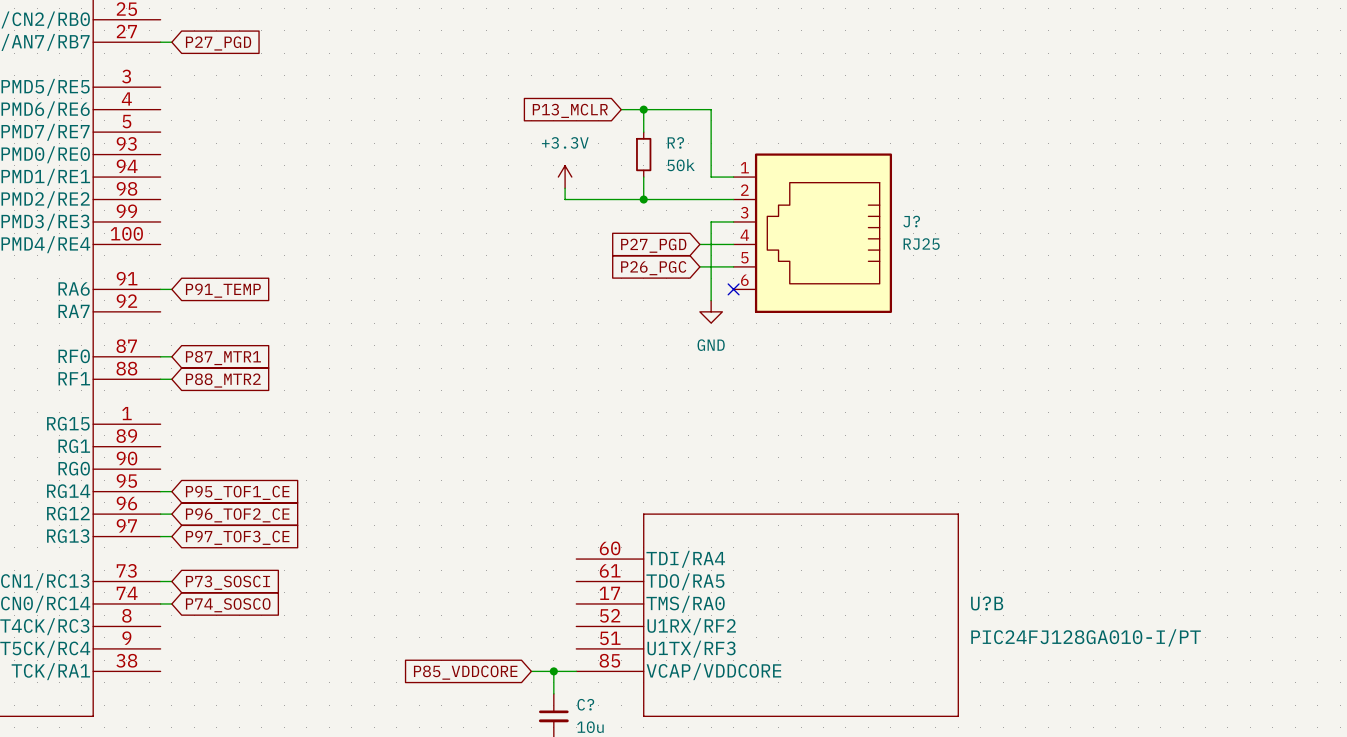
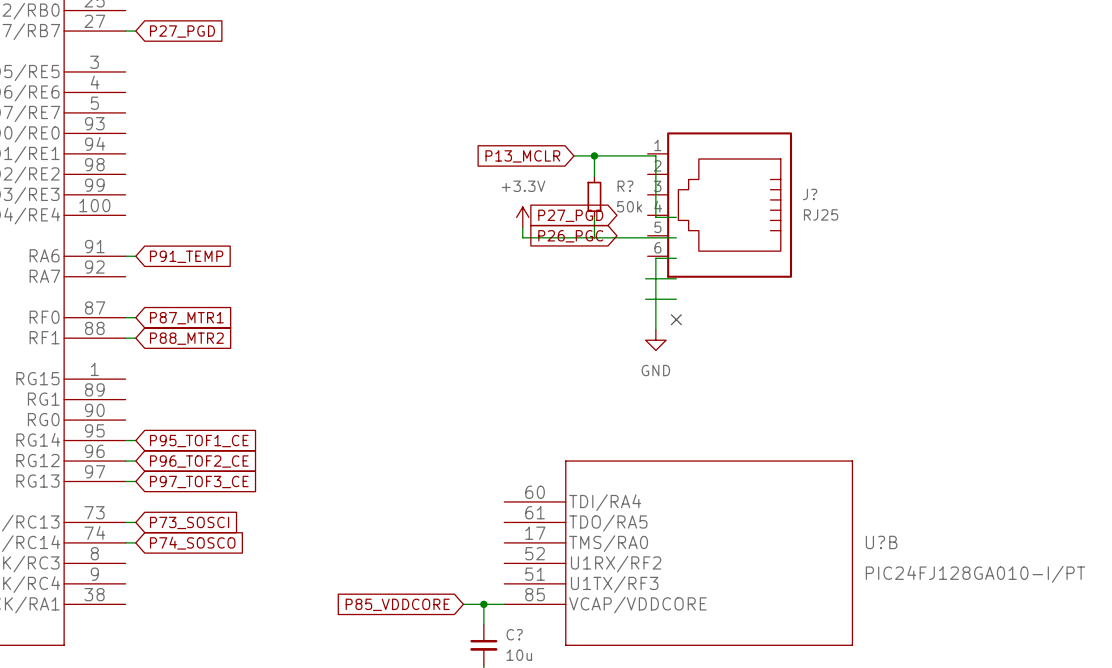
wire: (621, 109) (711, 109) (711, 177) (733, 177) -> (573, 155) (655, 155) (655, 217) (676, 217)
wire: (643, 109) (643, 132) -> (594, 155) (594, 176)
junction: (643, 109) -> none
global label position: P13_MCLR (570, 110) -> P13_MCLR (522, 156)
R? position: (643, 154) -> (594, 196)
power symbol position: +3.3V (565, 177) -> +3.3V (522, 217)
wire: (643, 177) (643, 199) -> (594, 217) (594, 237)
wire: (565, 188) (565, 199) (733, 199) -> (522, 227) (522, 237) (676, 237)
junction position: (643, 199) -> (594, 155)
wire: (733, 221) (711, 221) (711, 300) -> (676, 258) (655, 258) (655, 329)
wire: (699, 244) (733, 244) -> (645, 278) (676, 278)
wire: (699, 266) (733, 266) -> (645, 299) (676, 299)
no-connect mark: (733, 289) -> none
power symbol position: GND (711, 311) -> GND (655, 340)
no-connect mark: none -> (676, 319)

